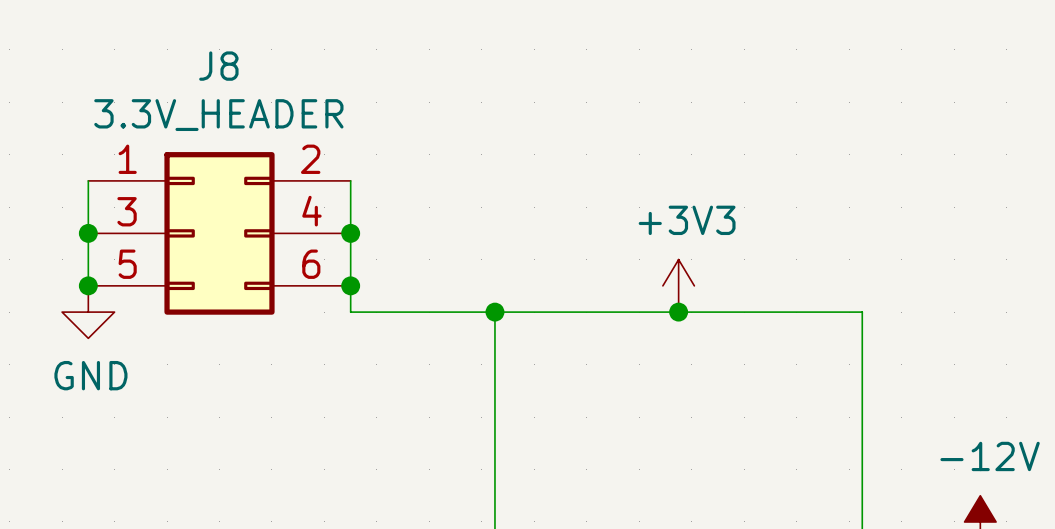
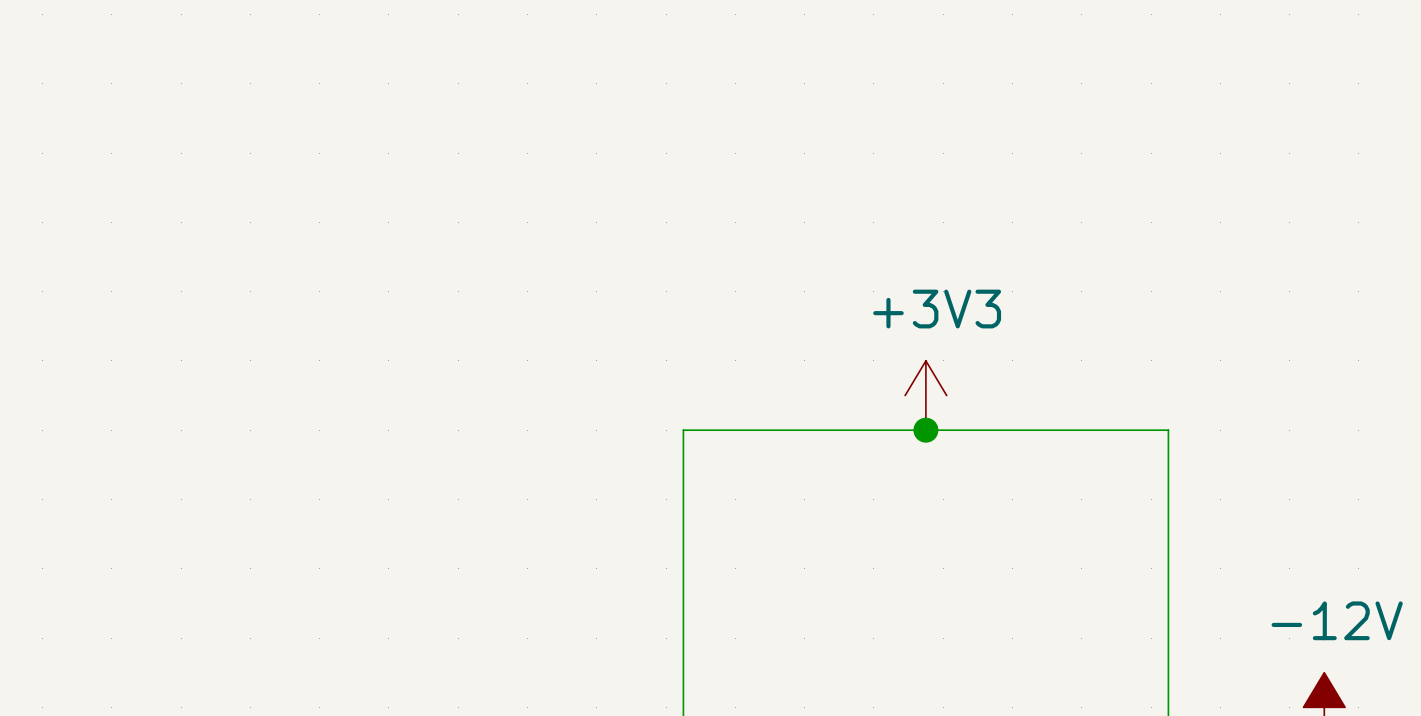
wire: (88, 180) (88, 285) -> none
wire: (350, 180) (350, 312) (494, 312) -> none
junction: (88, 233) -> none
J8: 3.3V_HEADER (219, 233) -> none
junction: (350, 233) -> none
junction: (88, 285) -> none
junction: (350, 285) -> none
power symbol: GND (88, 312) -> none
junction: (494, 312) -> none

